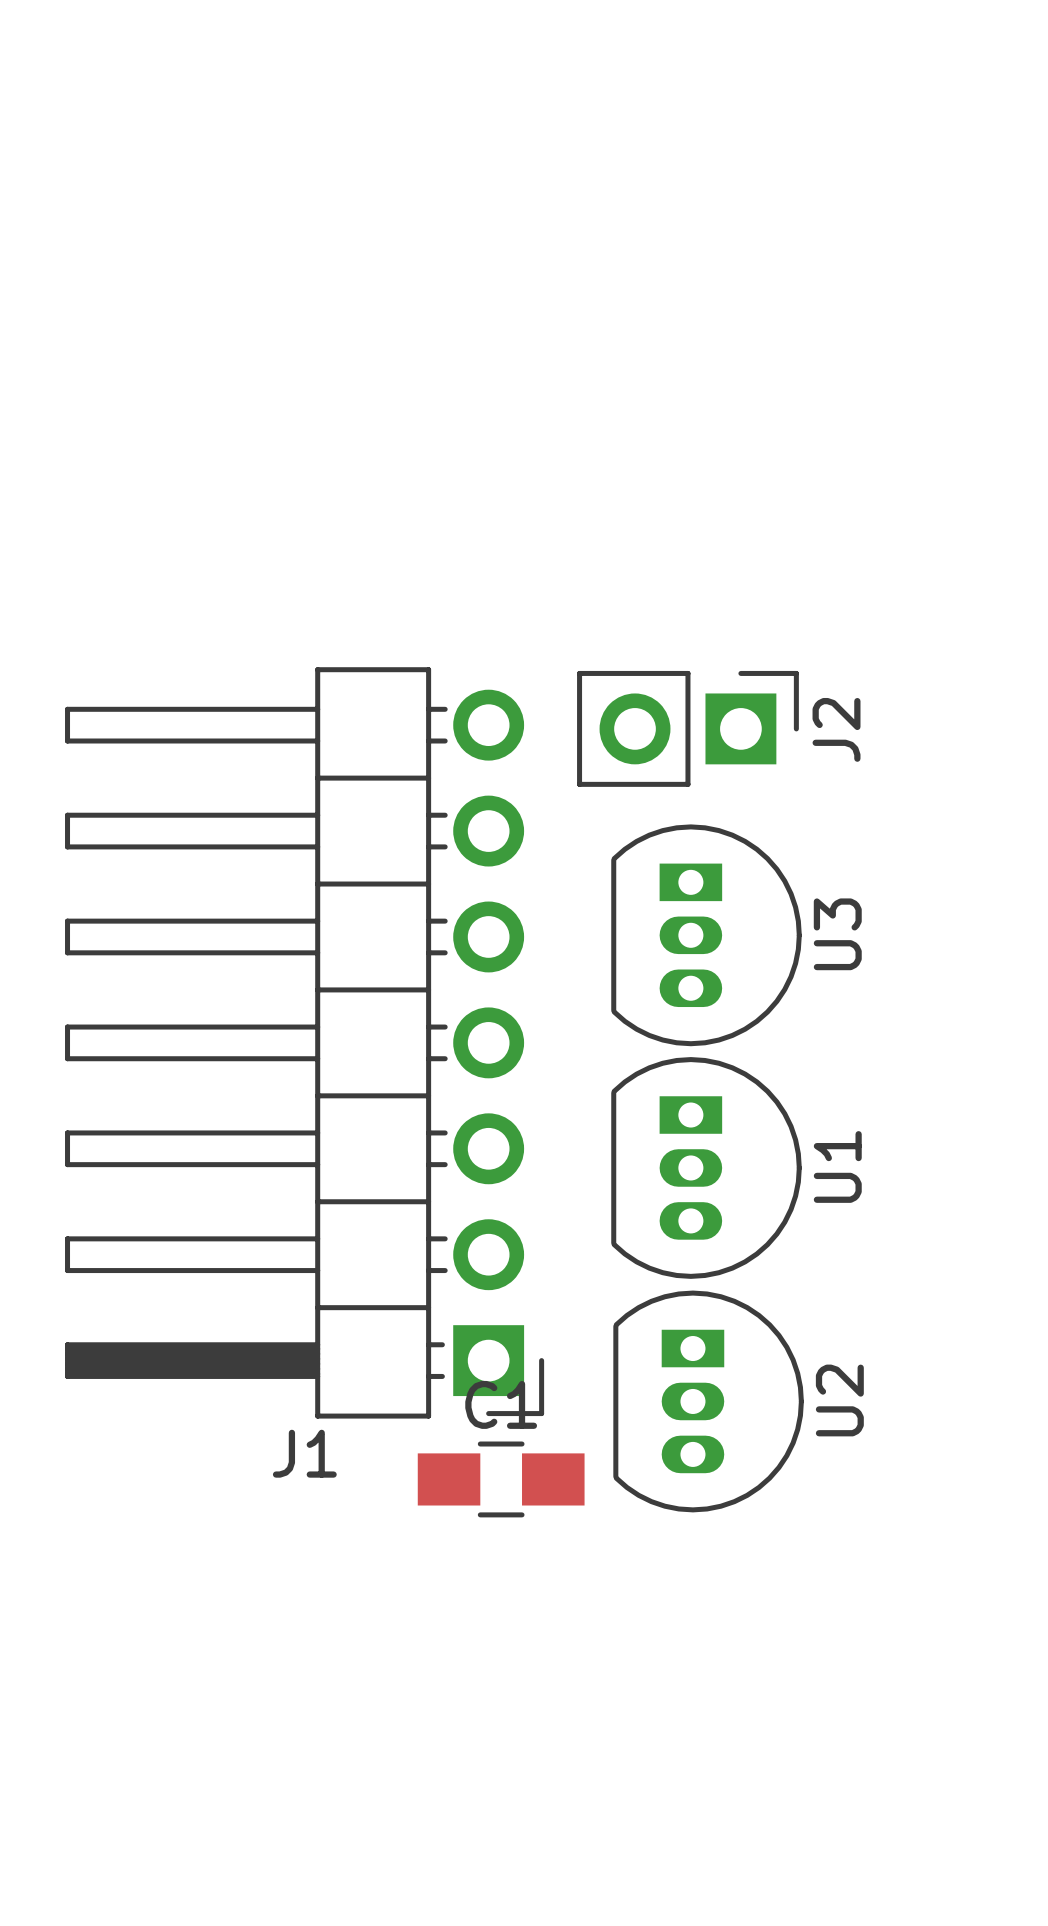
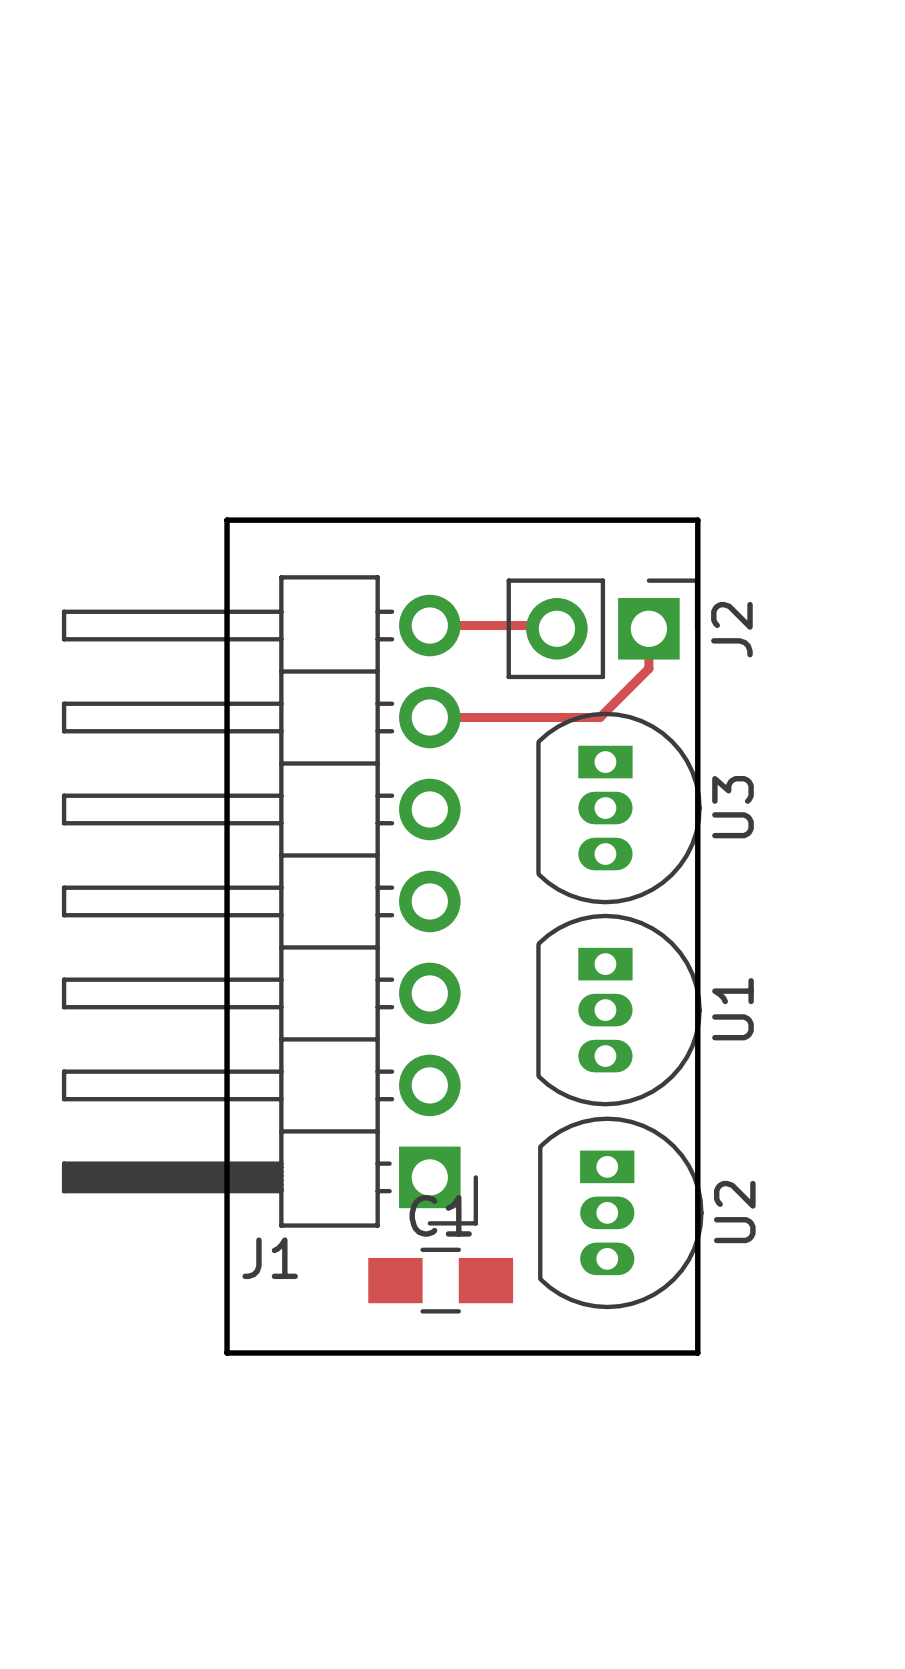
board edge: none -> (227, 520) (227, 1353) (697, 1353) (697, 520) (227, 520)
track: none -> (429, 625) (553, 625) (556, 628)
track: none -> (648, 628) (648, 668) (600, 717) (429, 717)

